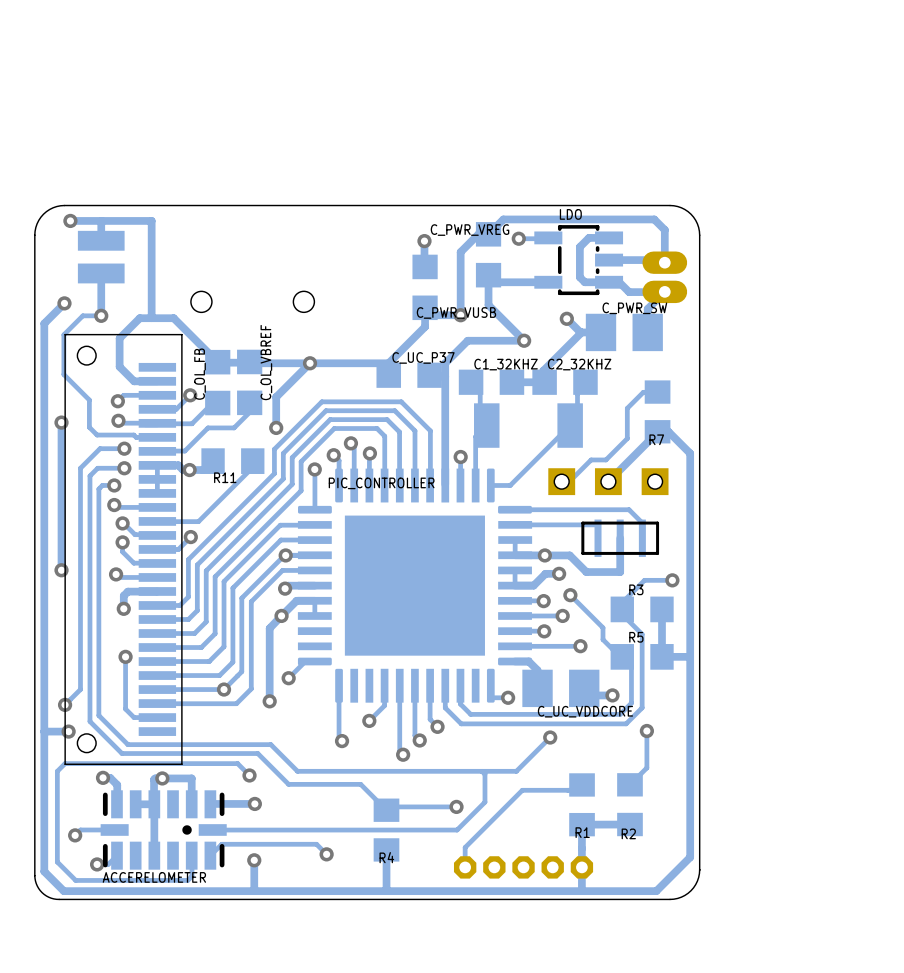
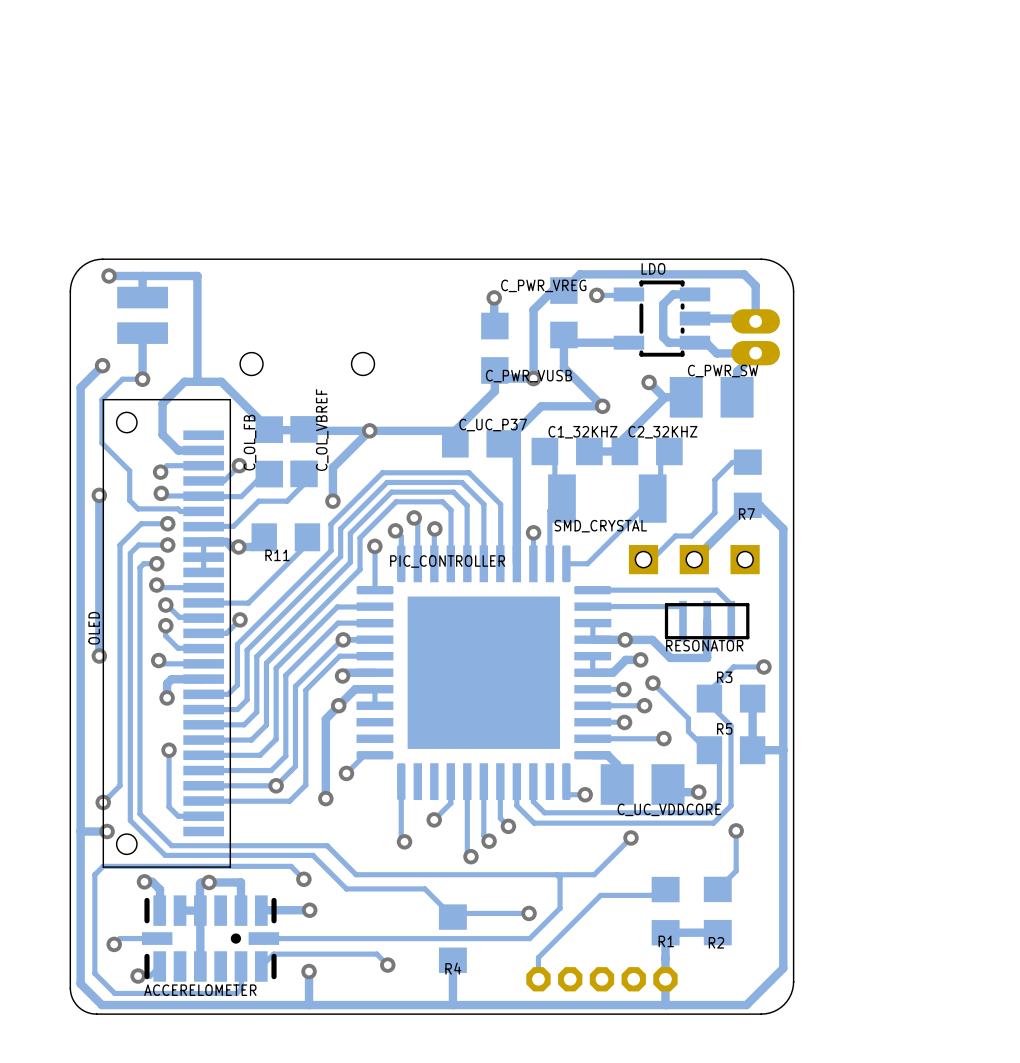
text: none -> SMD_CRYSTAL (600, 526)
text: none -> OLED (94, 628)
text: none -> RESONATOR (704, 645)

